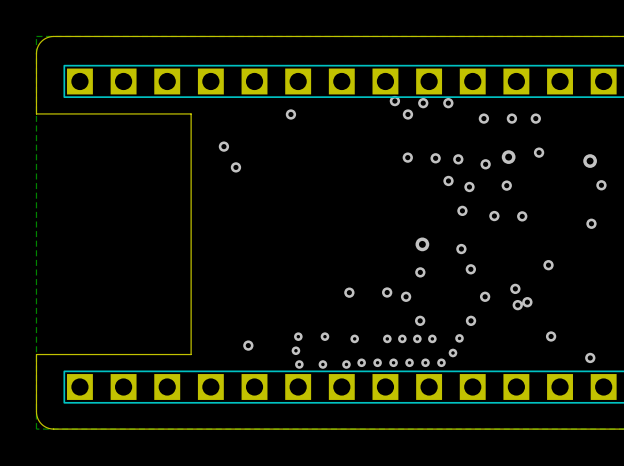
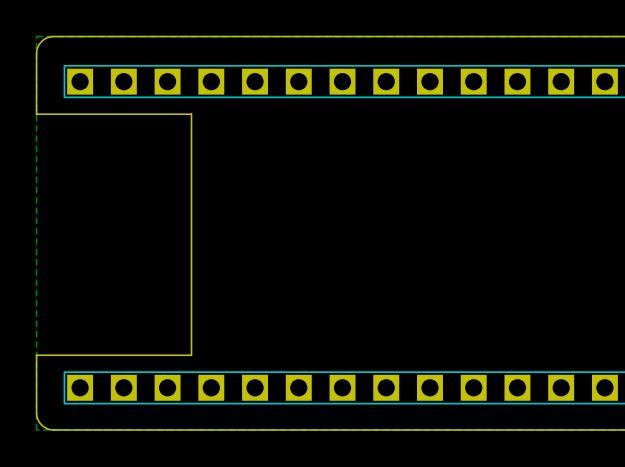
via: (394, 101) -> none
via: (423, 103) -> none
via: (448, 103) -> none
via: (290, 114) -> none
via: (407, 114) -> none
via: (483, 118) -> none
via: (511, 118) -> none
via: (535, 118) -> none
via: (223, 146) -> none
via: (539, 152) -> none
via: (407, 157) -> none
via: (508, 157) -> none
via: (435, 158) -> none
via: (458, 159) -> none
via: (590, 161) -> none
via: (485, 164) -> none
via: (235, 167) -> none
via: (448, 180) -> none
via: (506, 185) -> none
via: (601, 185) -> none
via: (469, 186) -> none
via: (462, 210) -> none
via: (494, 216) -> none
via: (522, 216) -> none
via: (591, 223) -> none
via: (422, 244) -> none
via: (461, 249) -> none
via: (548, 265) -> none
via: (470, 269) -> none
via: (420, 272) -> none
via: (515, 288) -> none
via: (349, 292) -> none
via: (387, 292) -> none
via: (406, 296) -> none
via: (485, 296) -> none
via: (527, 302) -> none
via: (517, 305) -> none
via: (420, 320) -> none
via: (471, 320) -> none
via: (298, 336) -> none
via: (324, 336) -> none
via: (551, 336) -> none
via: (354, 338) -> none
via: (387, 338) -> none
via: (402, 338) -> none
via: (417, 338) -> none
via: (432, 338) -> none
via: (459, 338) -> none
via: (248, 345) -> none
via: (295, 350) -> none
via: (452, 352) -> none
via: (590, 357) -> none
via: (361, 362) -> none
via: (377, 362) -> none
via: (393, 362) -> none
via: (409, 362) -> none
via: (425, 362) -> none
via: (441, 362) -> none
via: (299, 364) -> none
via: (322, 364) -> none
via: (346, 364) -> none

